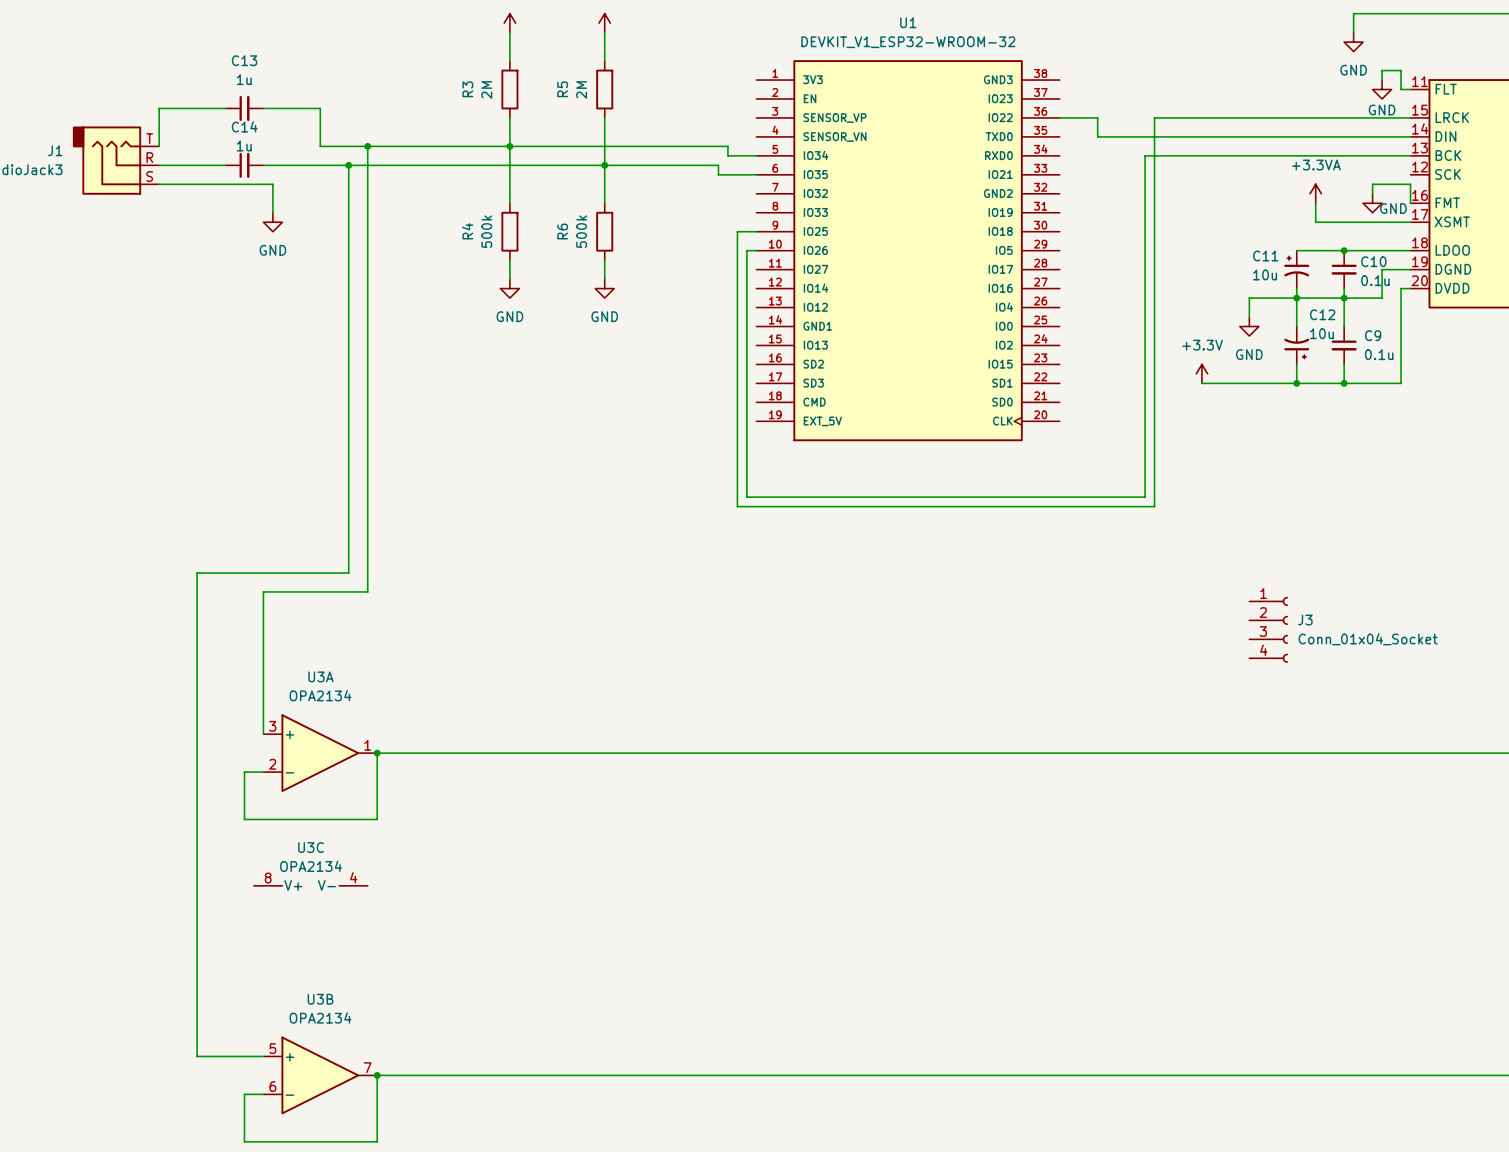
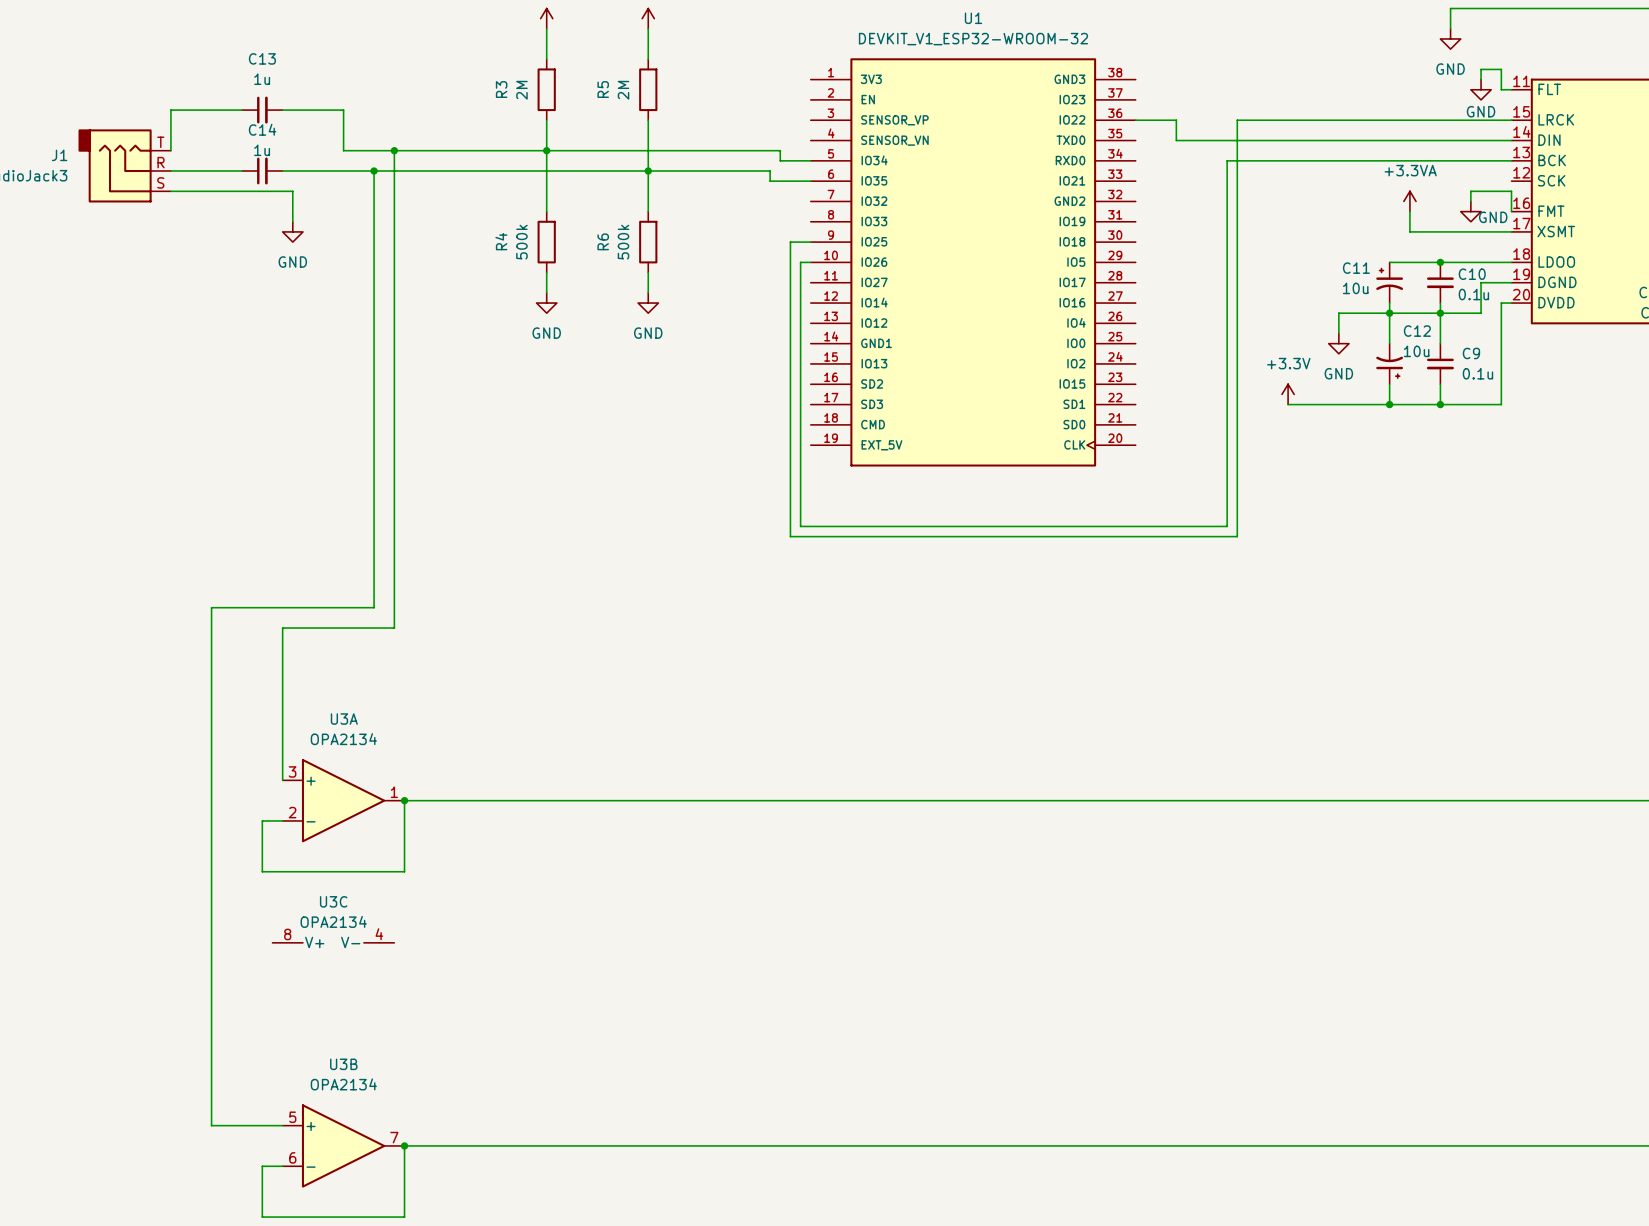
J3: Conn_01x04_Socket (1268, 629) -> none

